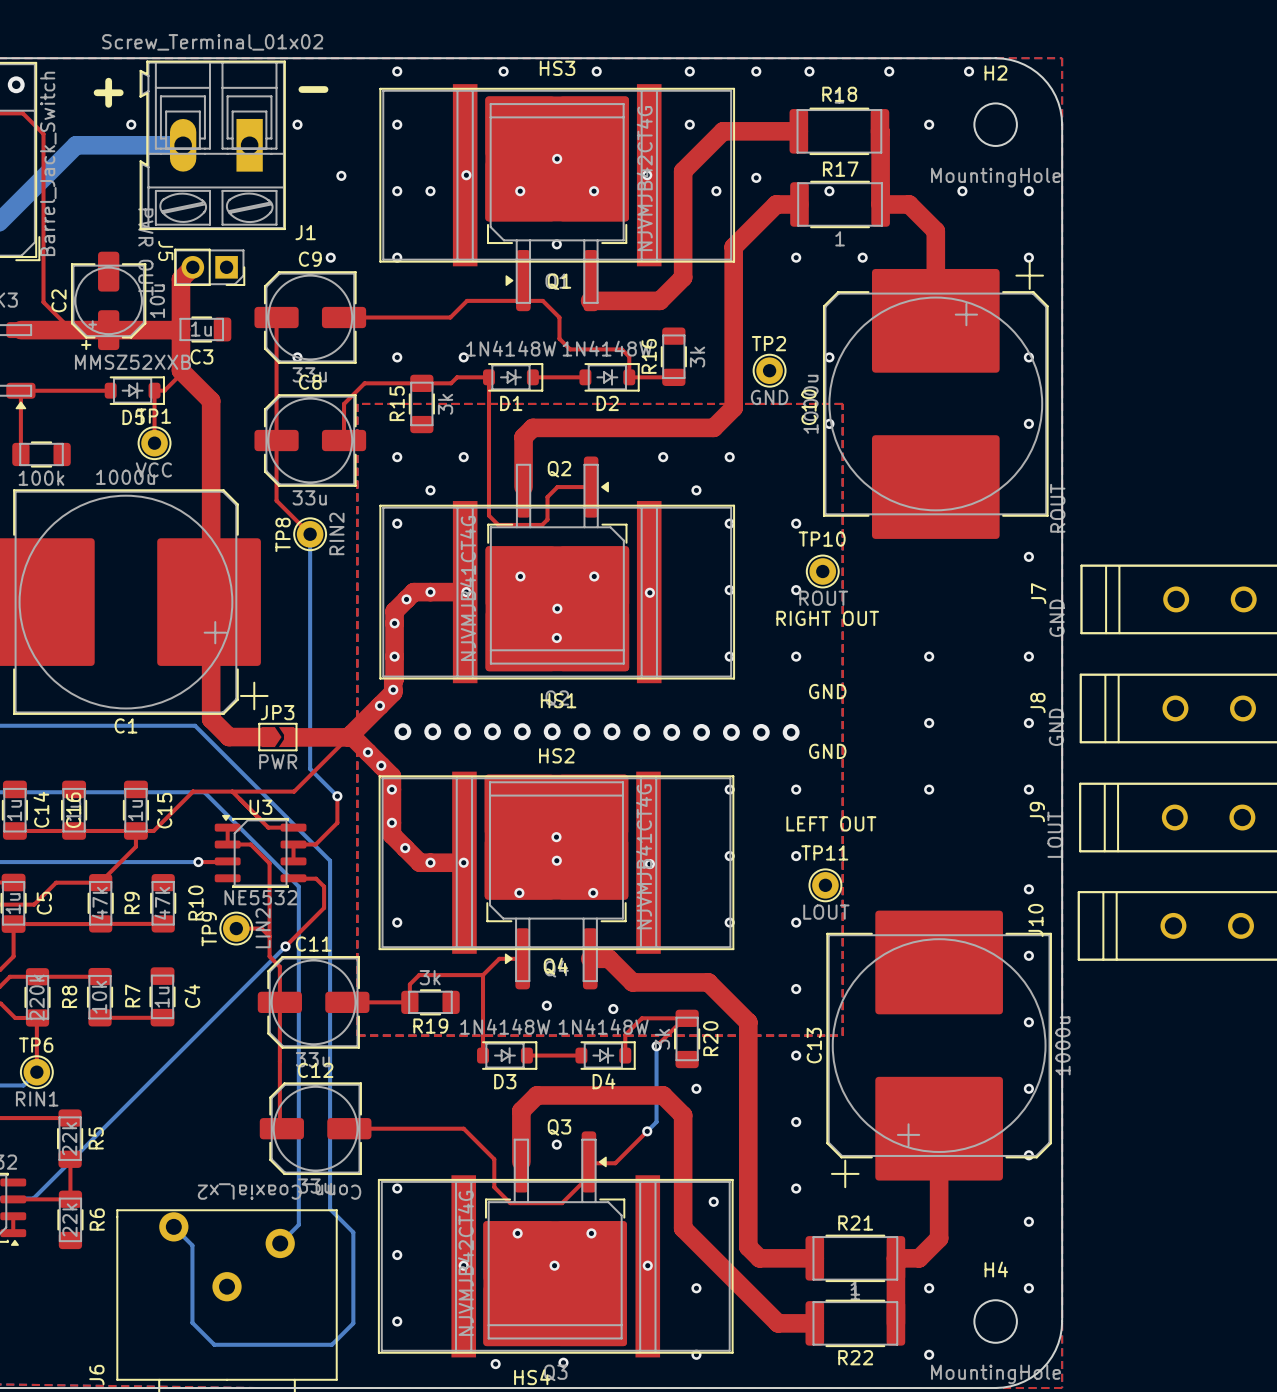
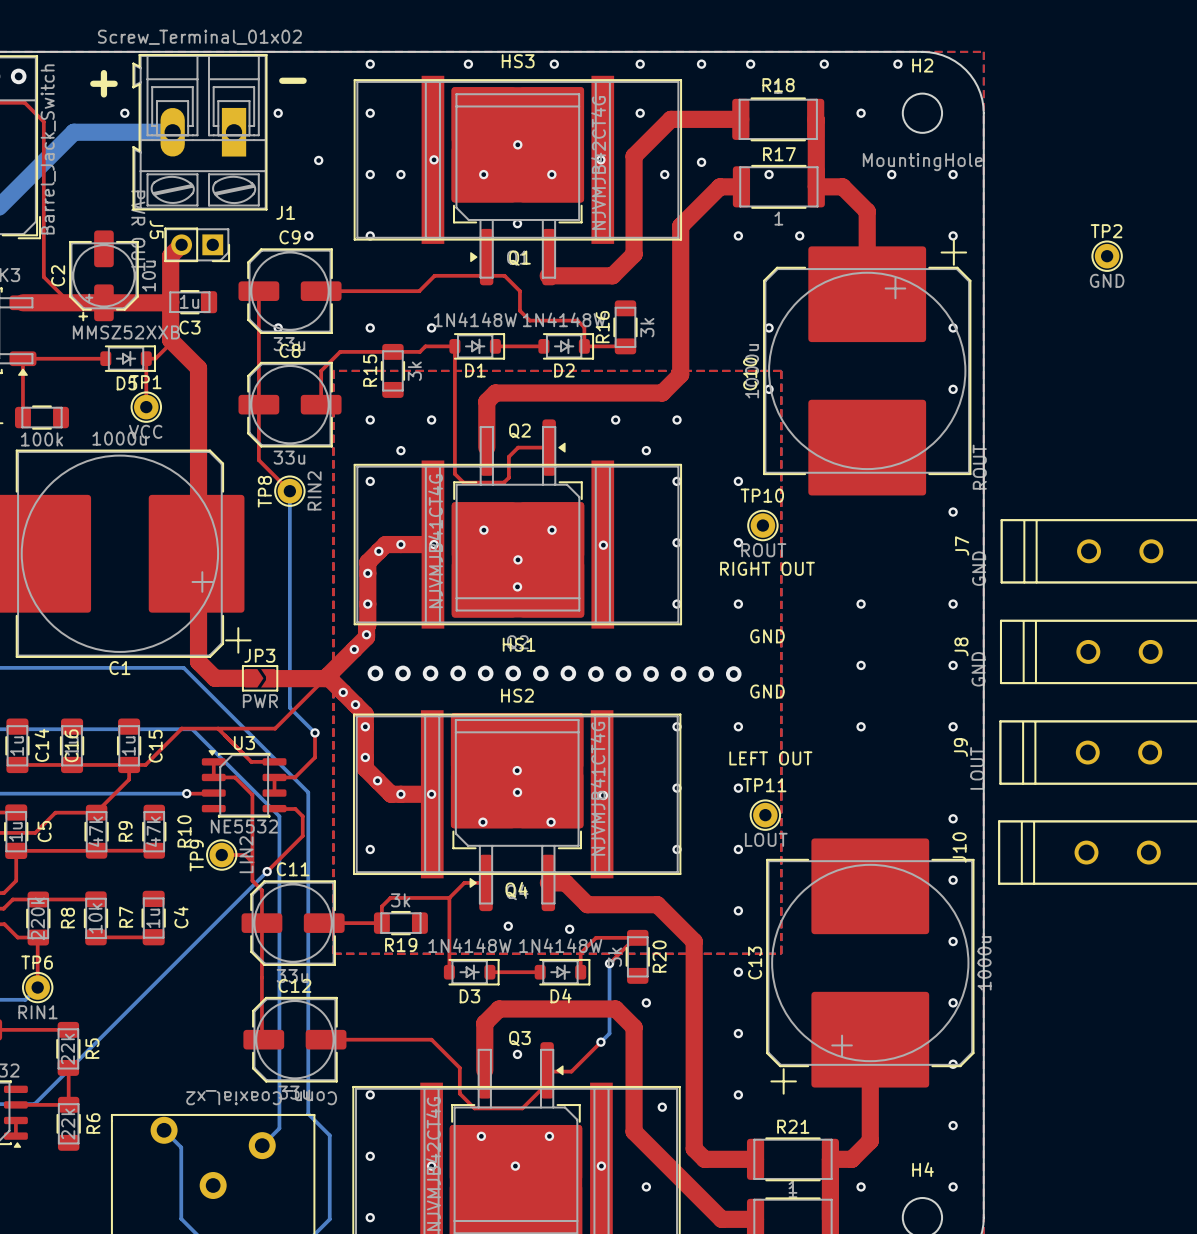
TP2 position: (769, 370) -> (1107, 256)

